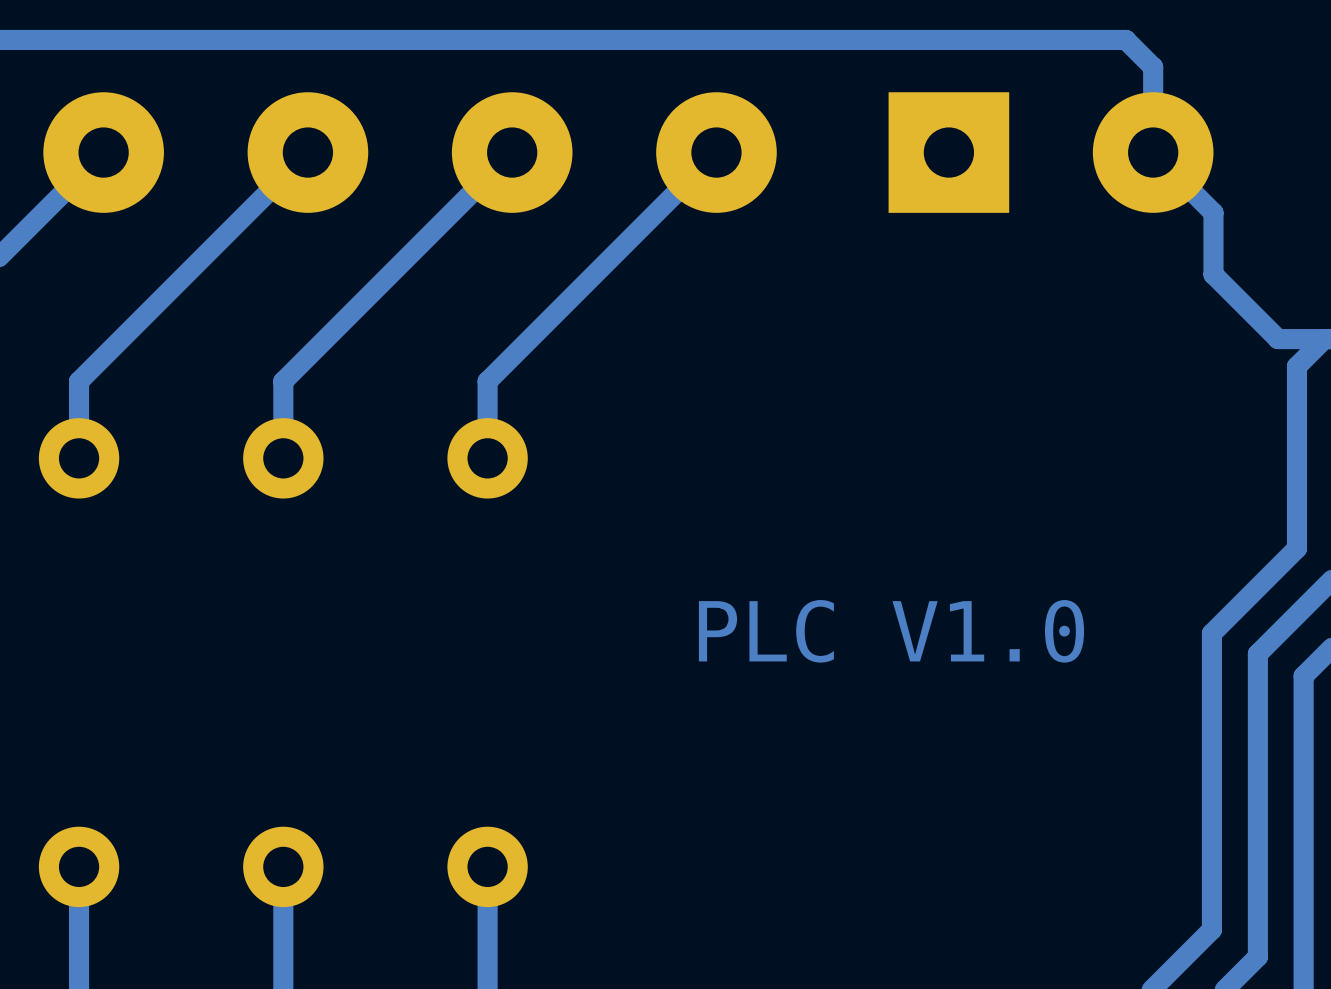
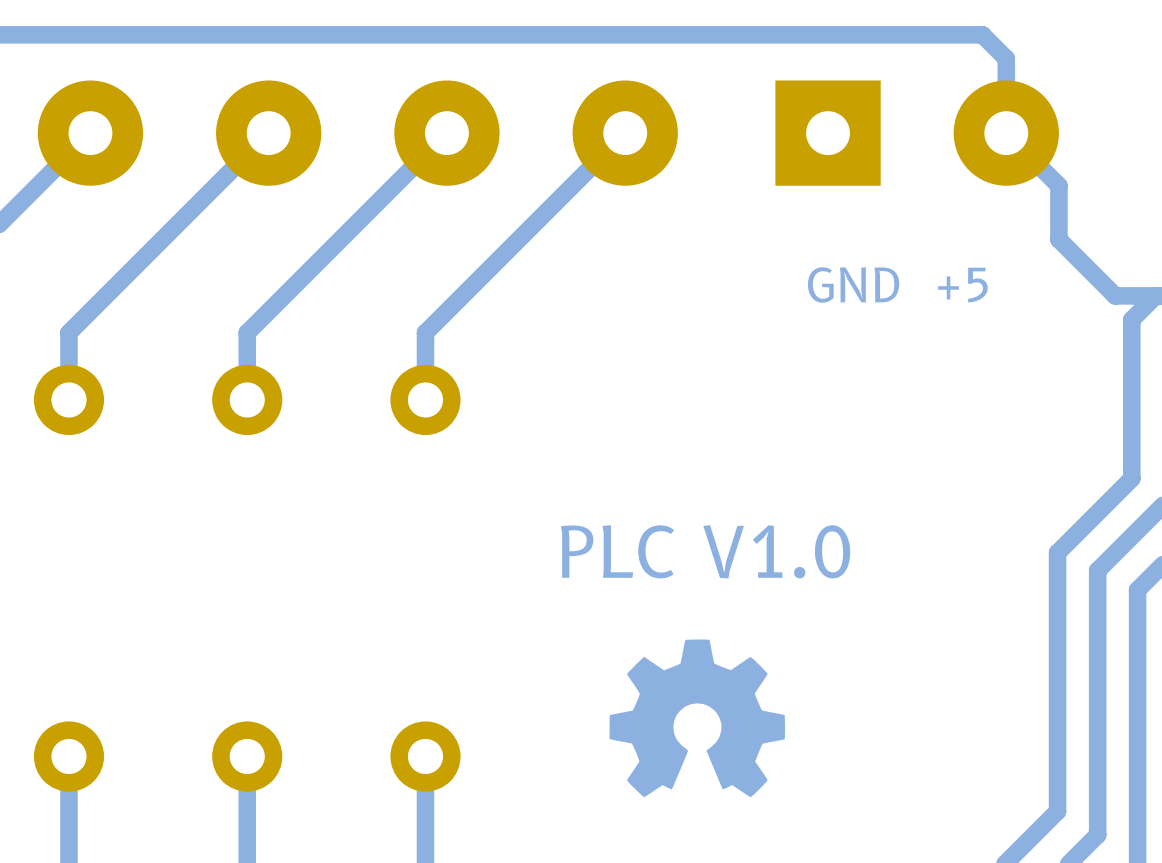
text: none -> GND (853, 284)
text: none -> +5 (962, 285)
text position: PLC V1.0 (891, 631) -> PLC V1.0 (705, 551)
drawing: none -> [609, 639, 786, 798]

